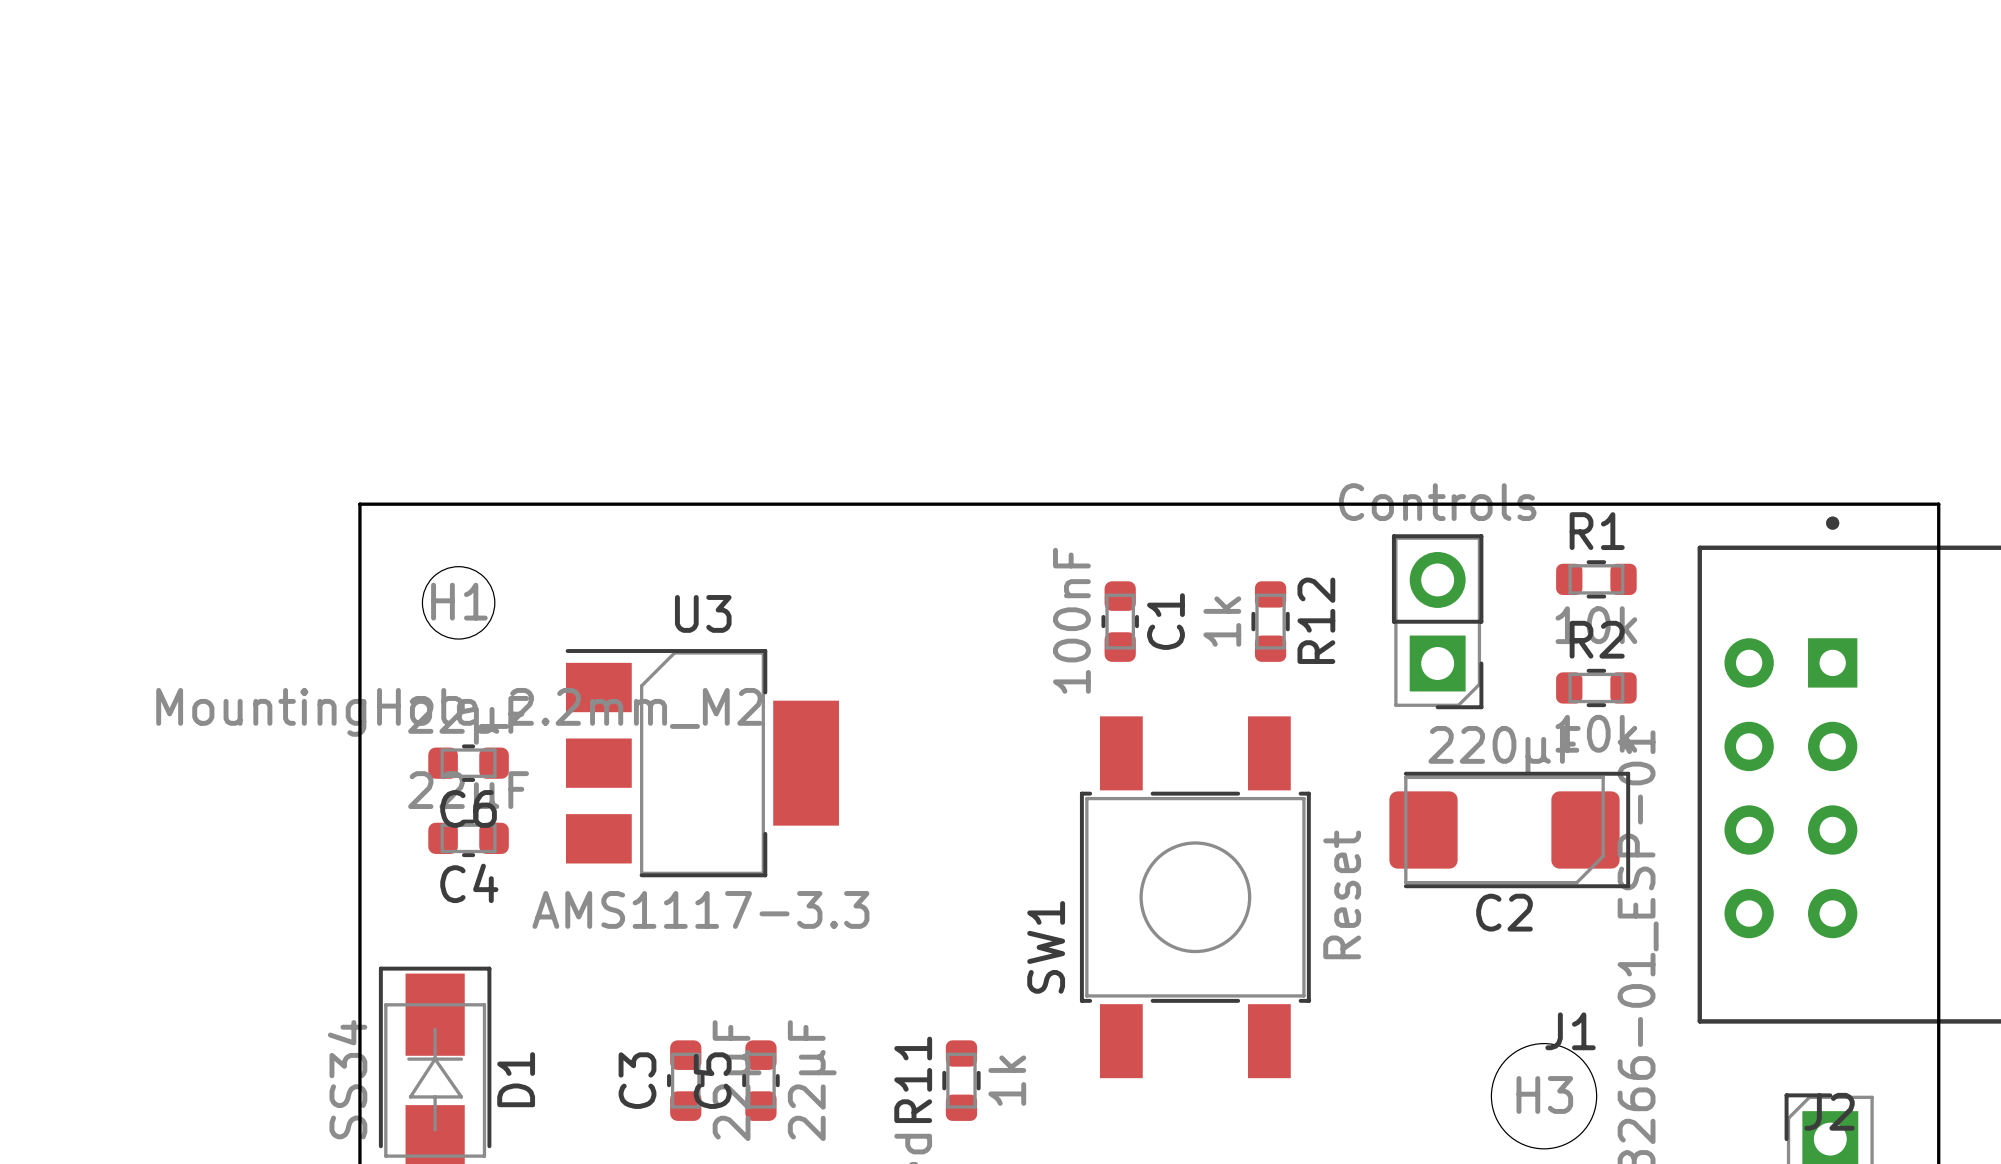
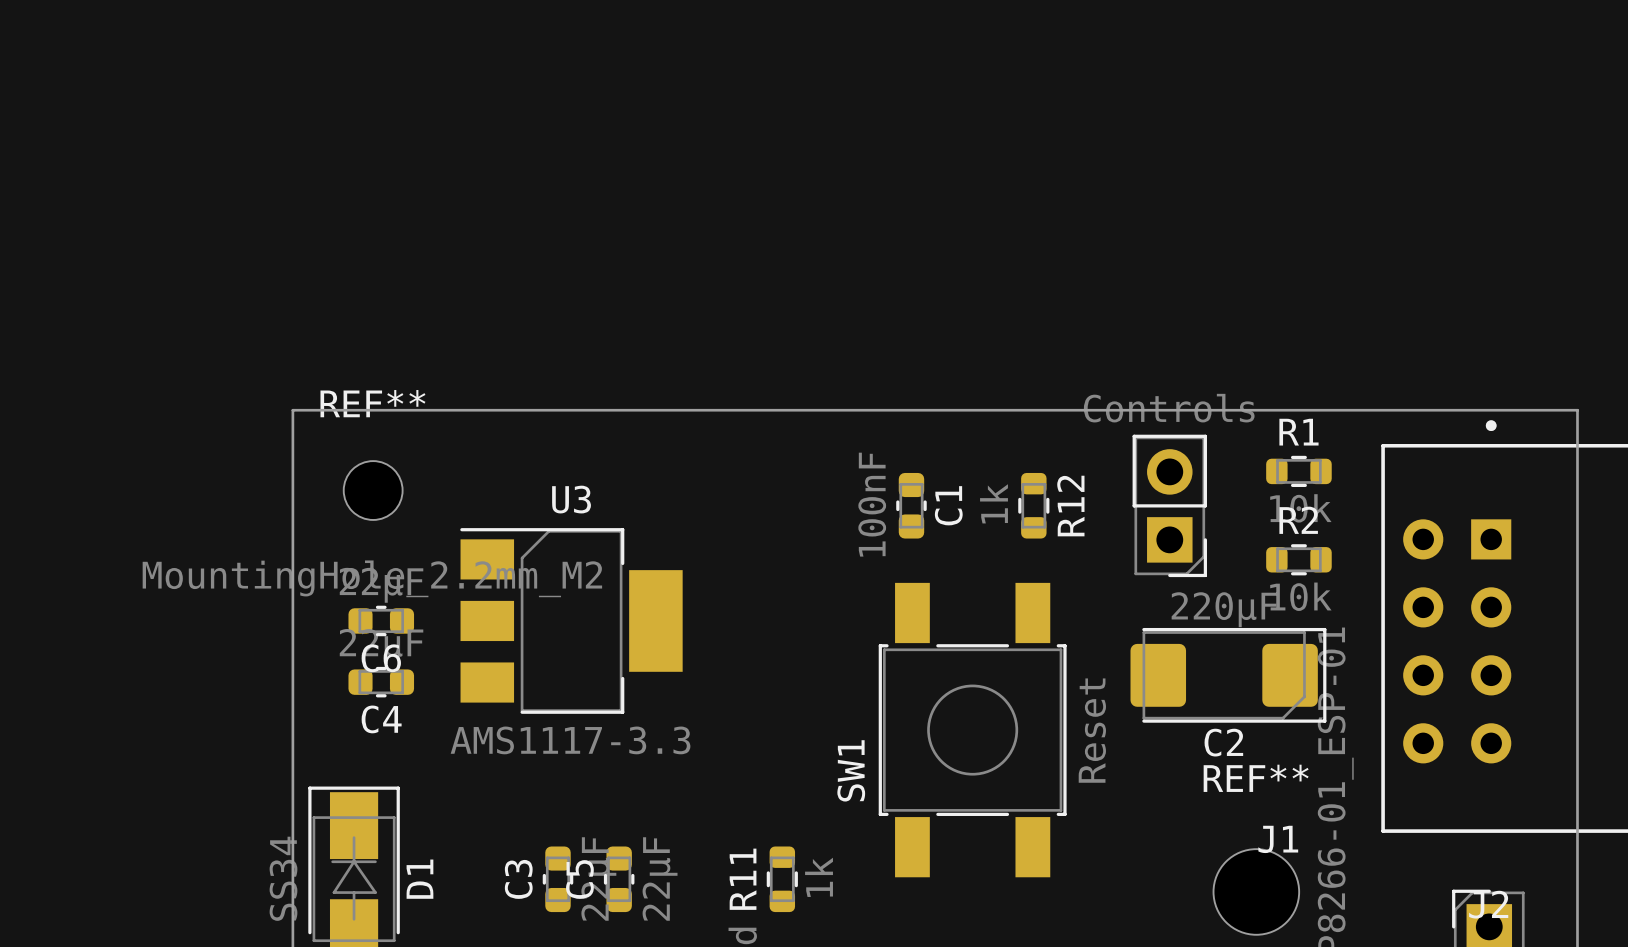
H1 name: H1 (459, 601) -> REF** (372, 403)
H3 name: H3 (1544, 1094) -> REF** (1256, 778)

